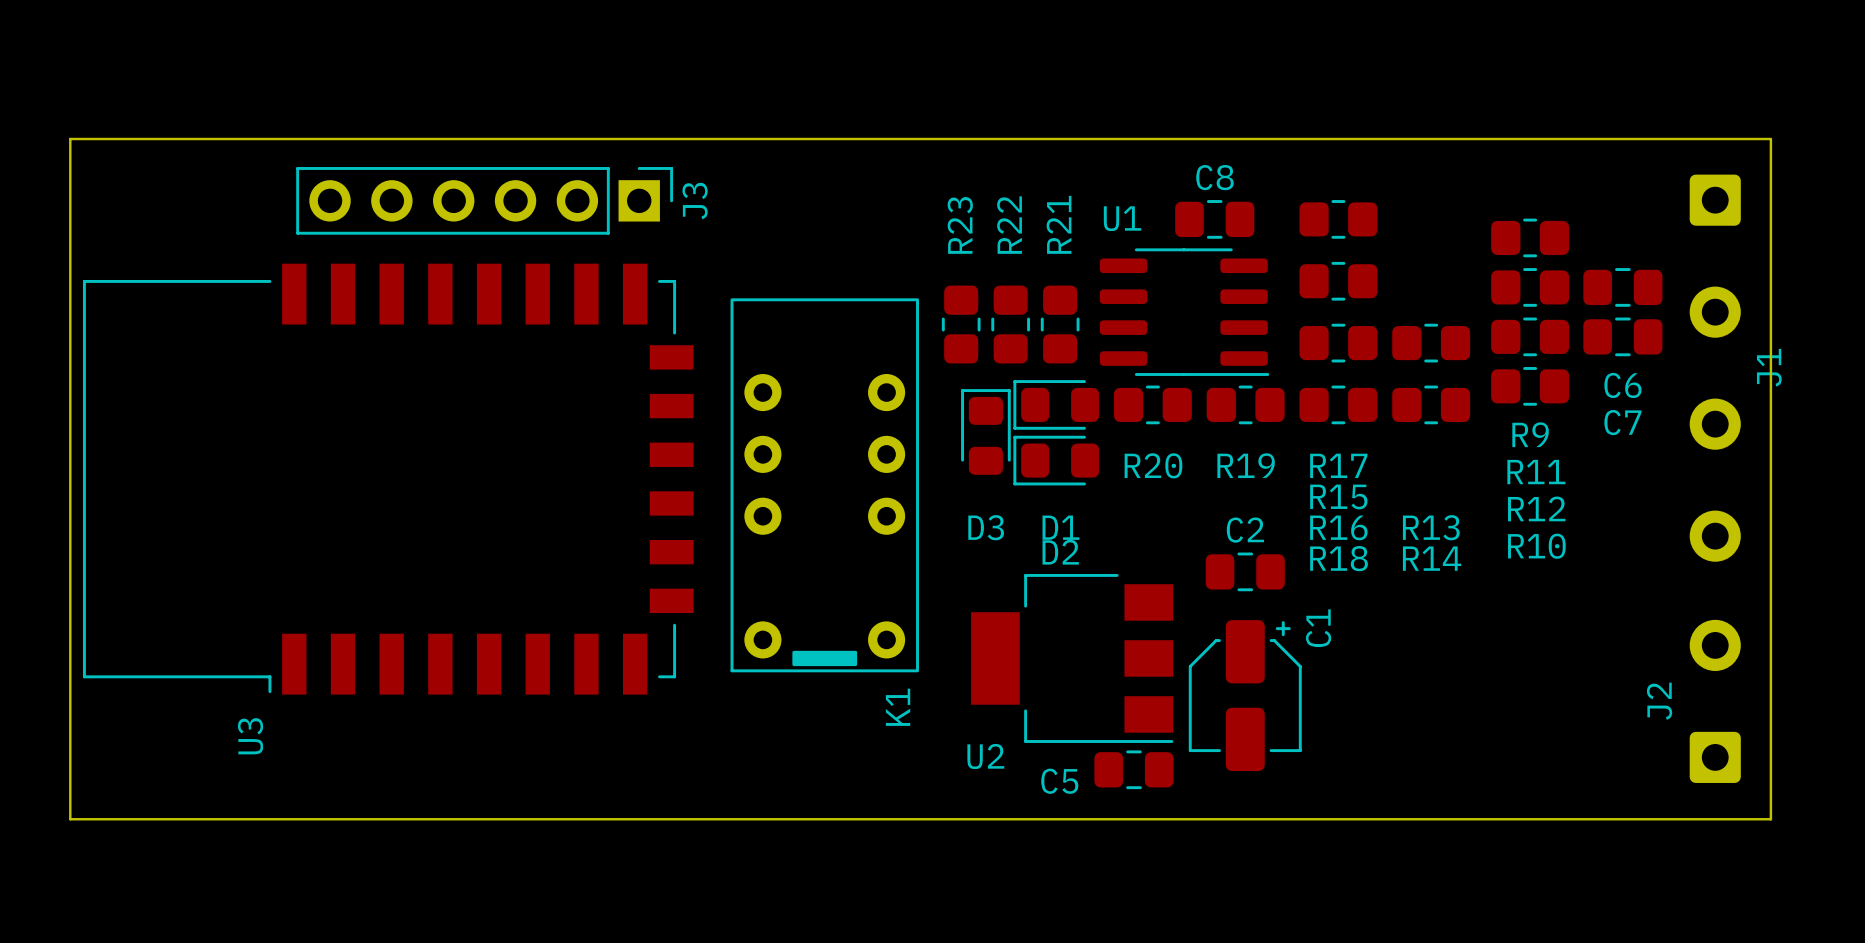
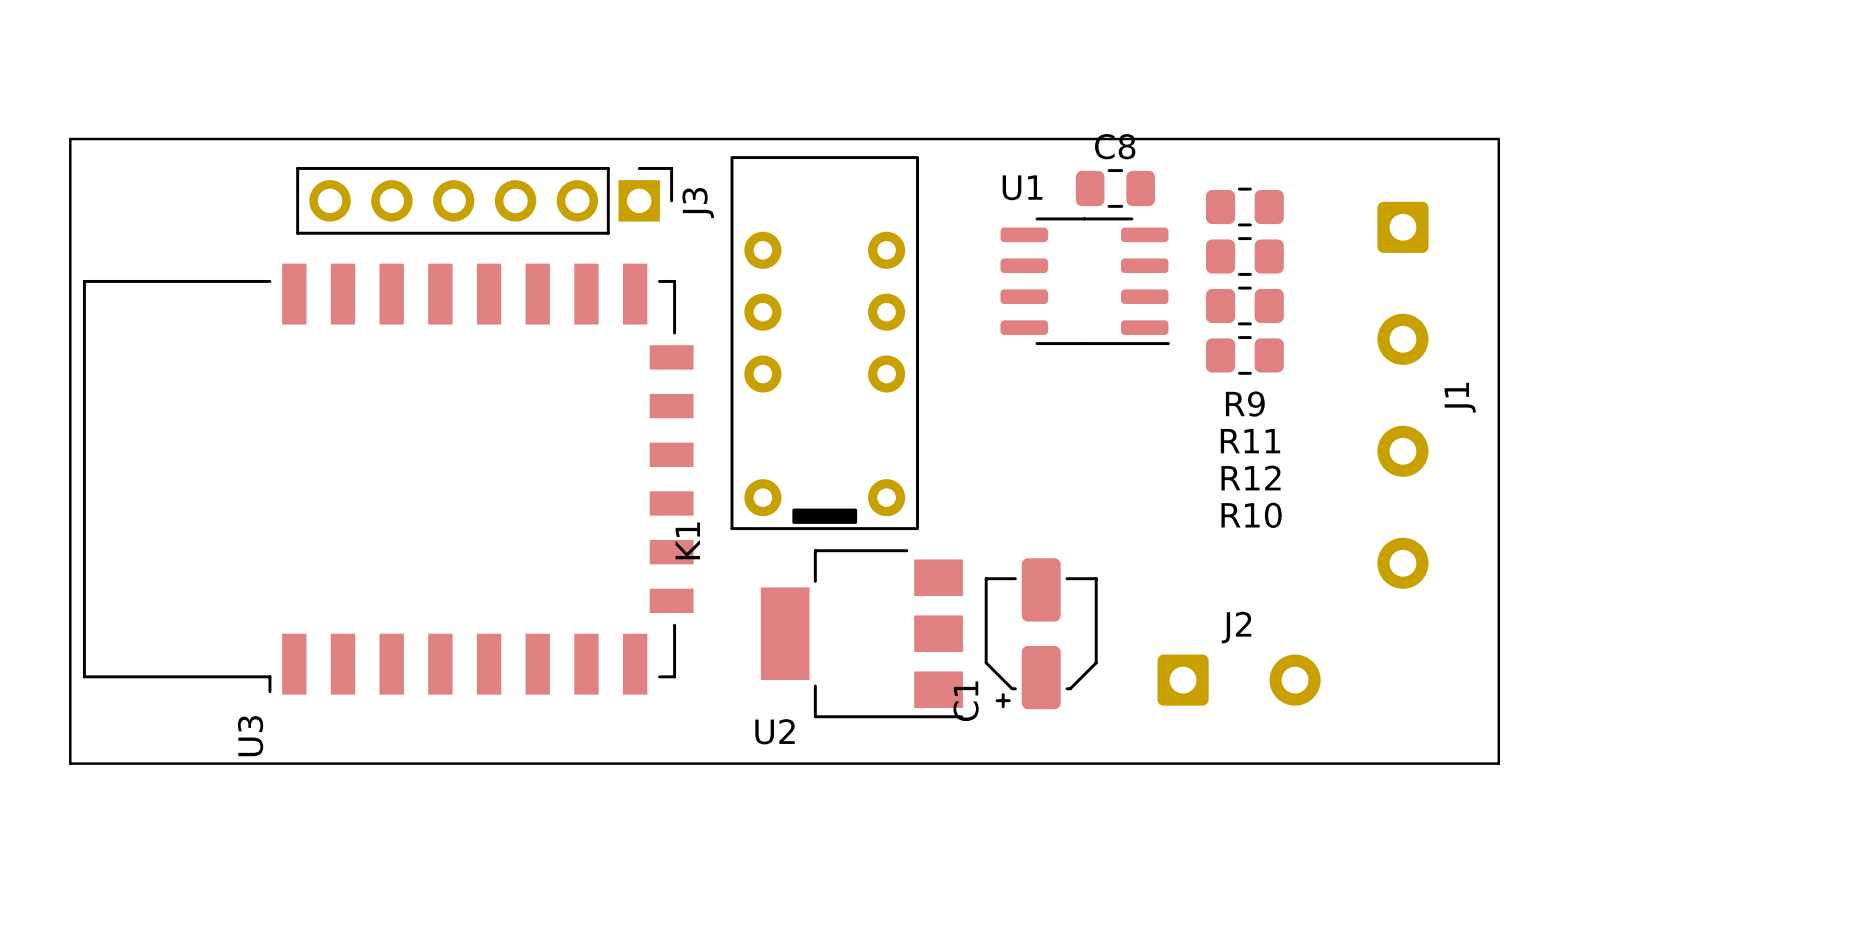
board edge: (1498, 139) (1770, 139) (1770, 819) (70, 819) (70, 763) -> (1498, 139) (1498, 763) (70, 763)
C8 position: (1214, 219) -> (1115, 188)
R17: (1338, 219) -> none
R9 position: (1530, 237) -> (1244, 207)
R15: (1338, 281) -> none
R11 position: (1530, 287) -> (1244, 256)
C6: (1622, 287) -> none
U1 position: (1184, 312) -> (1085, 281)
R23: (961, 324) -> none
R22: (1010, 324) -> none
R21: (1060, 324) -> none
R12 position: (1530, 336) -> (1244, 305)
C7: (1622, 336) -> none
R16: (1338, 343) -> none
R13: (1431, 343) -> none
J1 position: (1715, 368) -> (1402, 395)
R10 position: (1530, 386) -> (1244, 355)
D1: (1056, 404) -> none
R20: (1152, 404) -> none
R19: (1245, 404) -> none
R18: (1338, 404) -> none
R14: (1431, 404) -> none
D3: (985, 431) -> none
D2: (1056, 460) -> none
K1 position: (824, 485) -> (824, 343)
C2: (1245, 571) -> none
U2 position: (1072, 658) -> (861, 633)
C1 rotation: 0° (1245, 695) -> 180° (1041, 633)
C1 position: (1245, 695) -> (1041, 633)
J2 rotation: 0° (1715, 701) -> 90° clockwise (1239, 680)
J2 position: (1715, 701) -> (1239, 680)
K1 name position: K1 (898, 707) -> K1 (687, 540)
C5: (1133, 769) -> none

